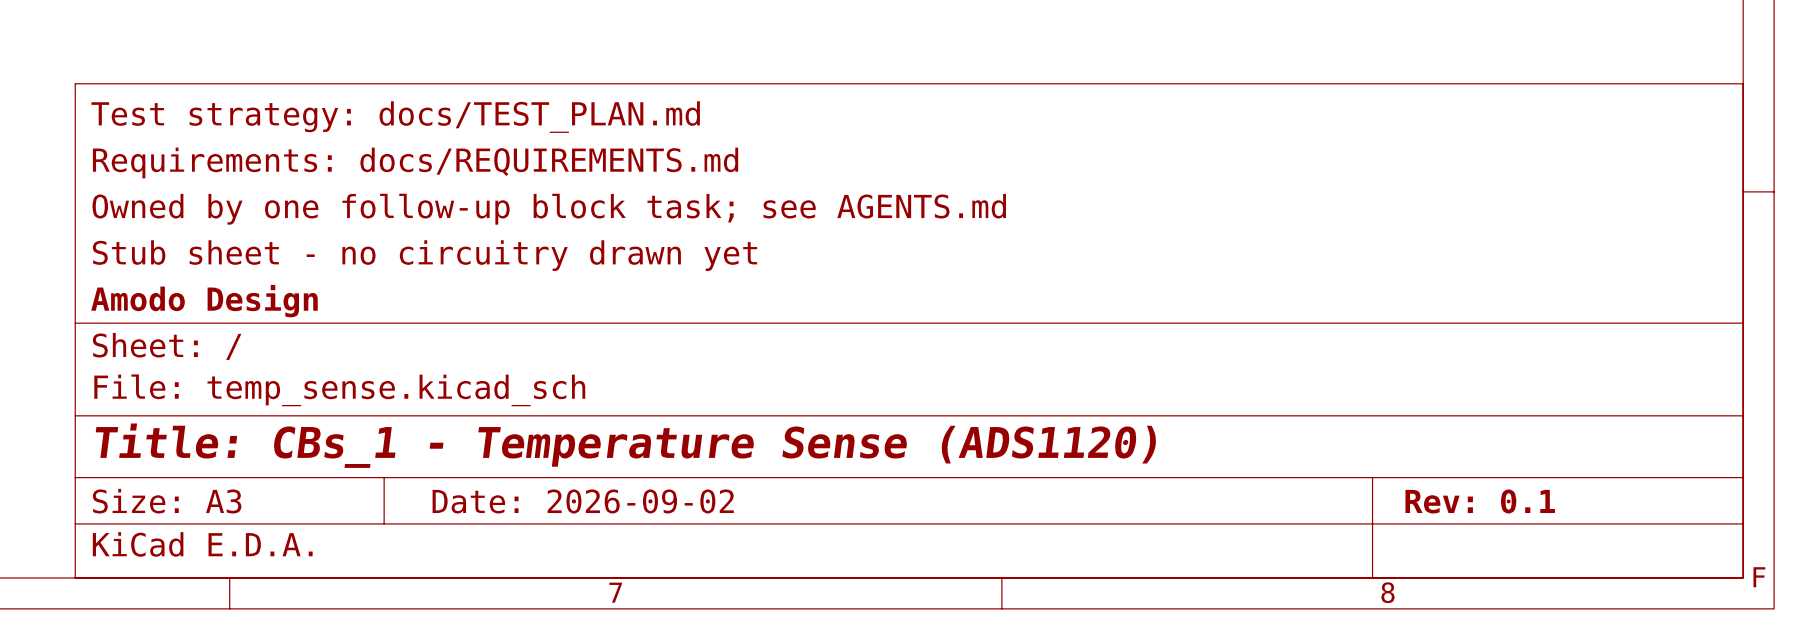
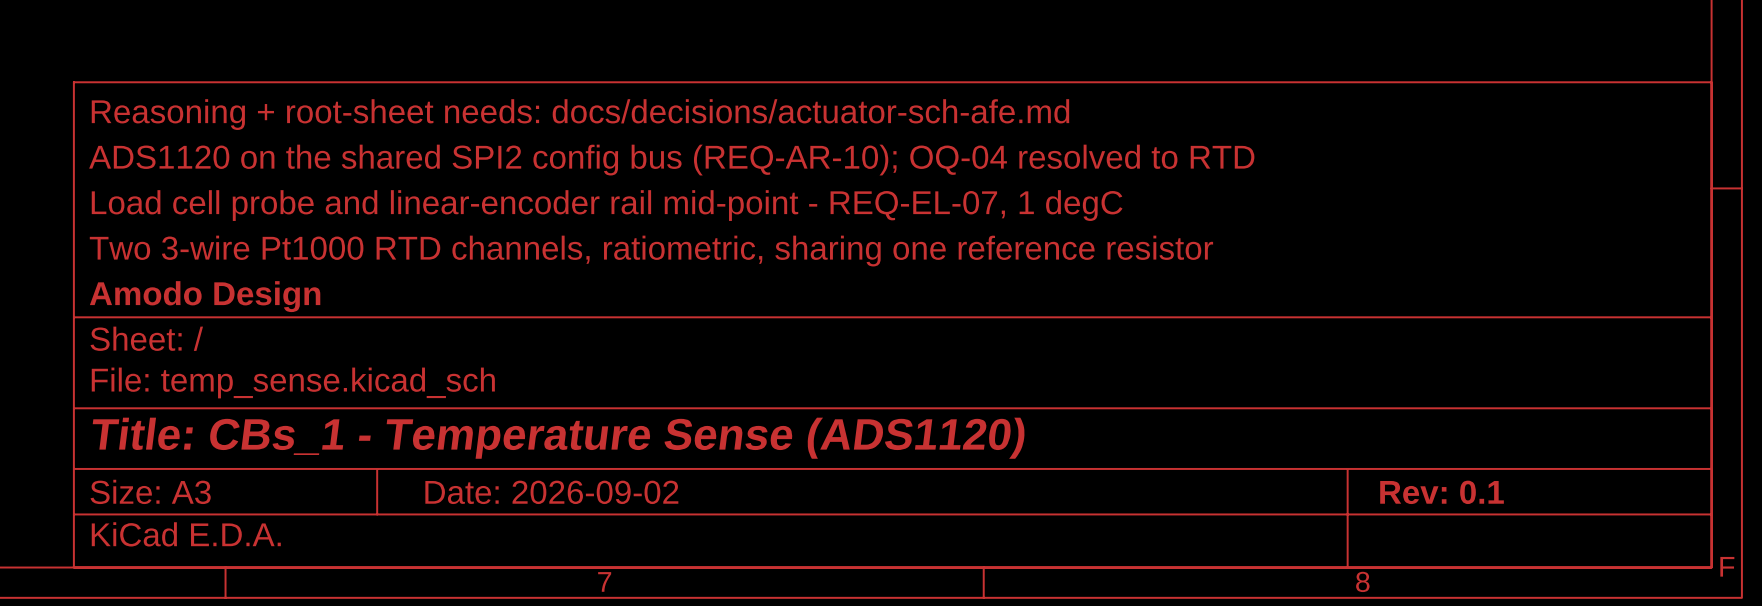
title block: Test strategy: docs/TEST_PLAN.md (395, 117) -> Reasoning + root-sheet needs: docs/decisions/actuator-sch-afe.md (580, 114)
title block: Requirements: docs/REQUIREMENTS.md (415, 162) -> ADS1120 on the shared SPI2 config bus (REQ-AR-10); OQ-04 resolved to RTD (671, 160)
title block: Owned by one follow-up block task; see AGENTS.md (549, 209) -> Load cell probe and linear-encoder rail mid-point - REQ-EL-07, 1 degC (607, 205)
title block: Stub sheet - no circuitry drawn yet (424, 255) -> Two 3-wire Pt1000 RTD channels, ratiometric, sharing one reference resistor (651, 251)

